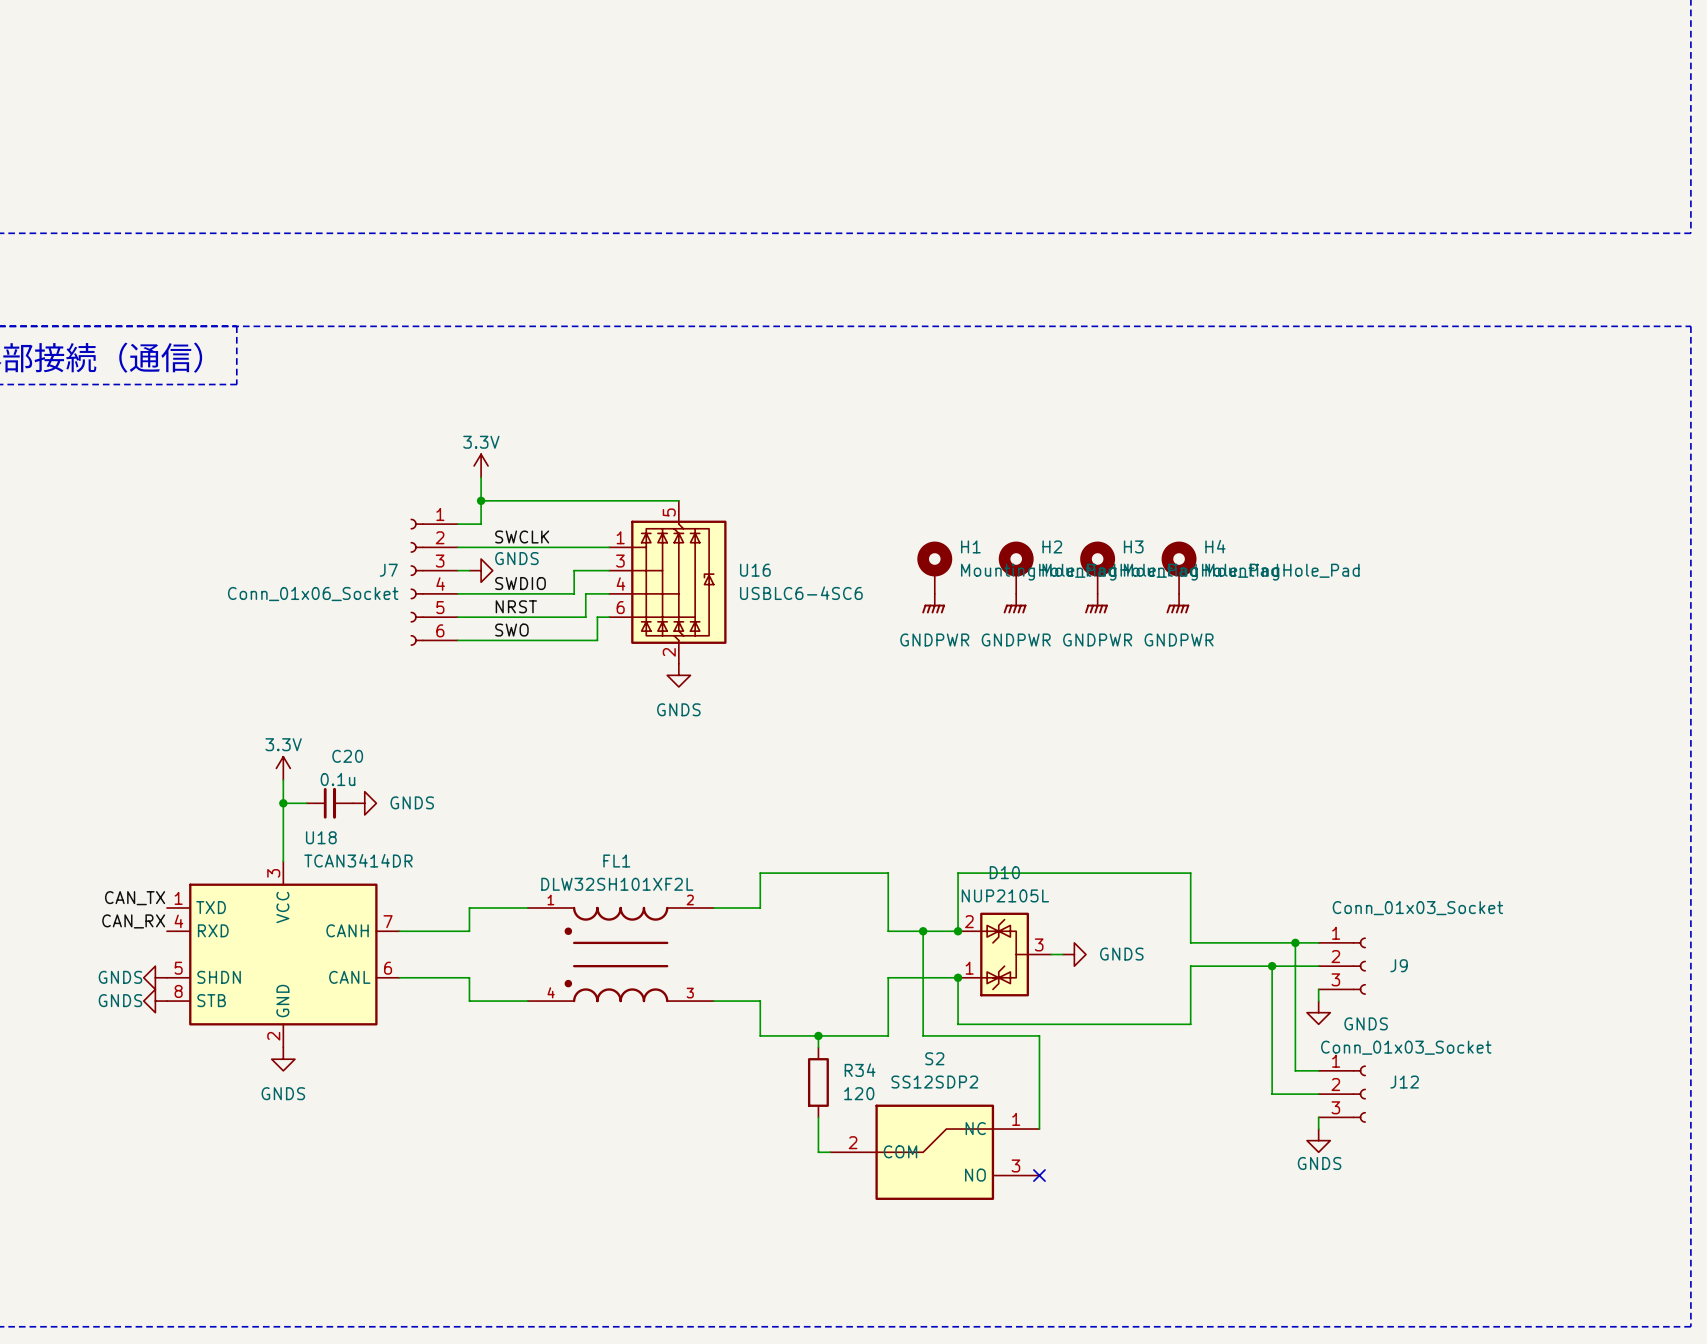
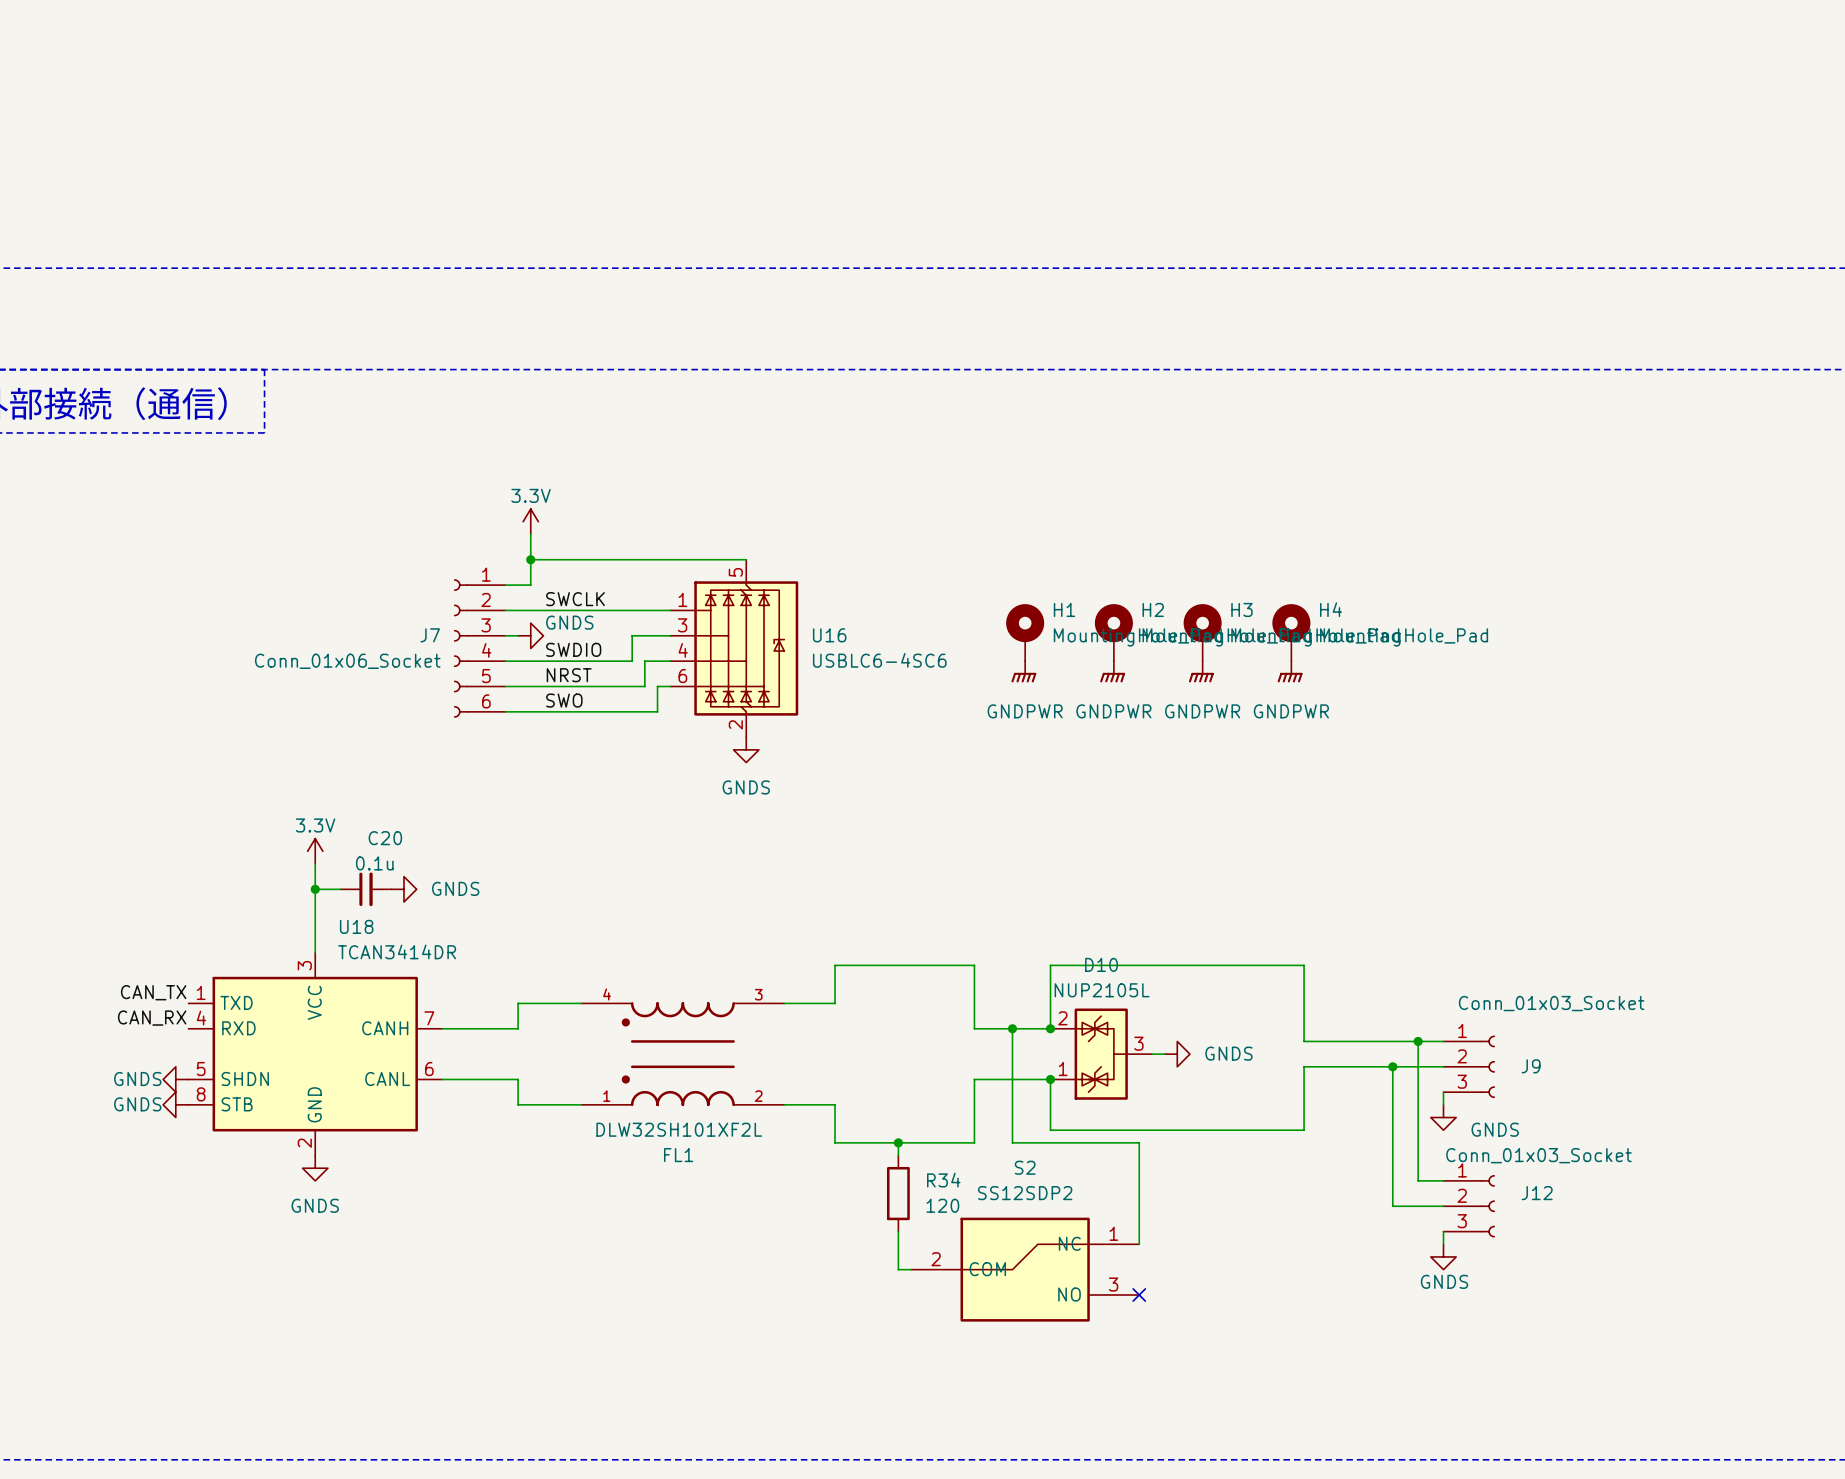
FL1 flip: as is (616, 954) -> up-down (678, 1054)

